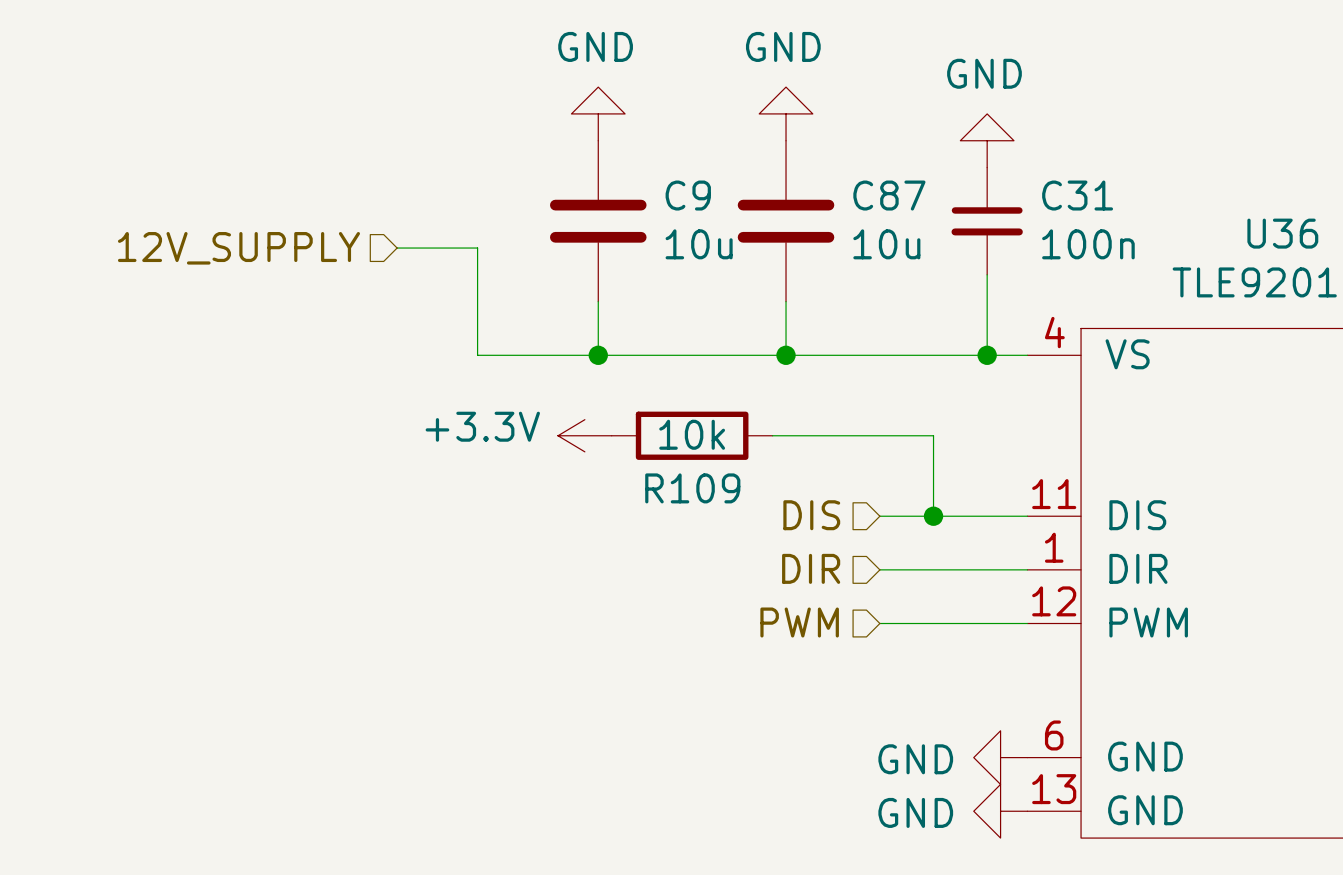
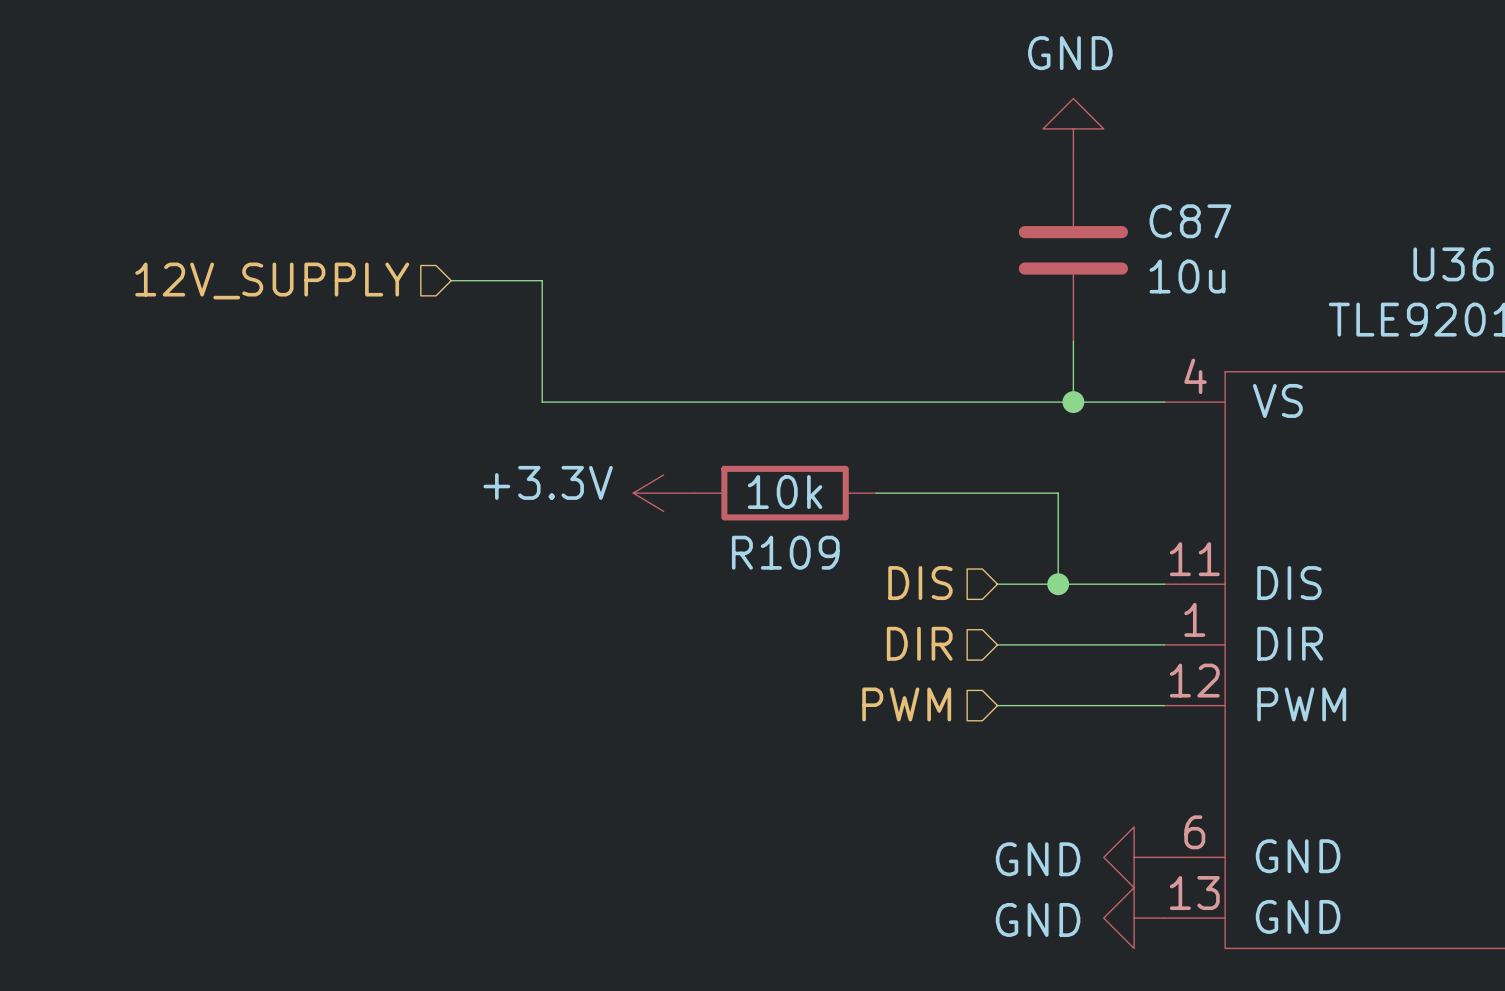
power symbol: GND (598, 113) -> none
power symbol: GND (786, 113) -> none
power symbol position: GND (987, 140) -> GND (1073, 128)
C9: 10u (598, 221) -> none
C87 position: (786, 221) -> (1073, 250)
C31: 100n (987, 221) -> none
wire: (987, 274) (987, 355) -> none
wire: (598, 301) (598, 355) -> none
wire: (786, 301) (786, 355) -> (1073, 341) (1073, 402)
junction: (598, 355) -> none
junction: (786, 355) -> none
junction position: (987, 355) -> (1073, 402)

